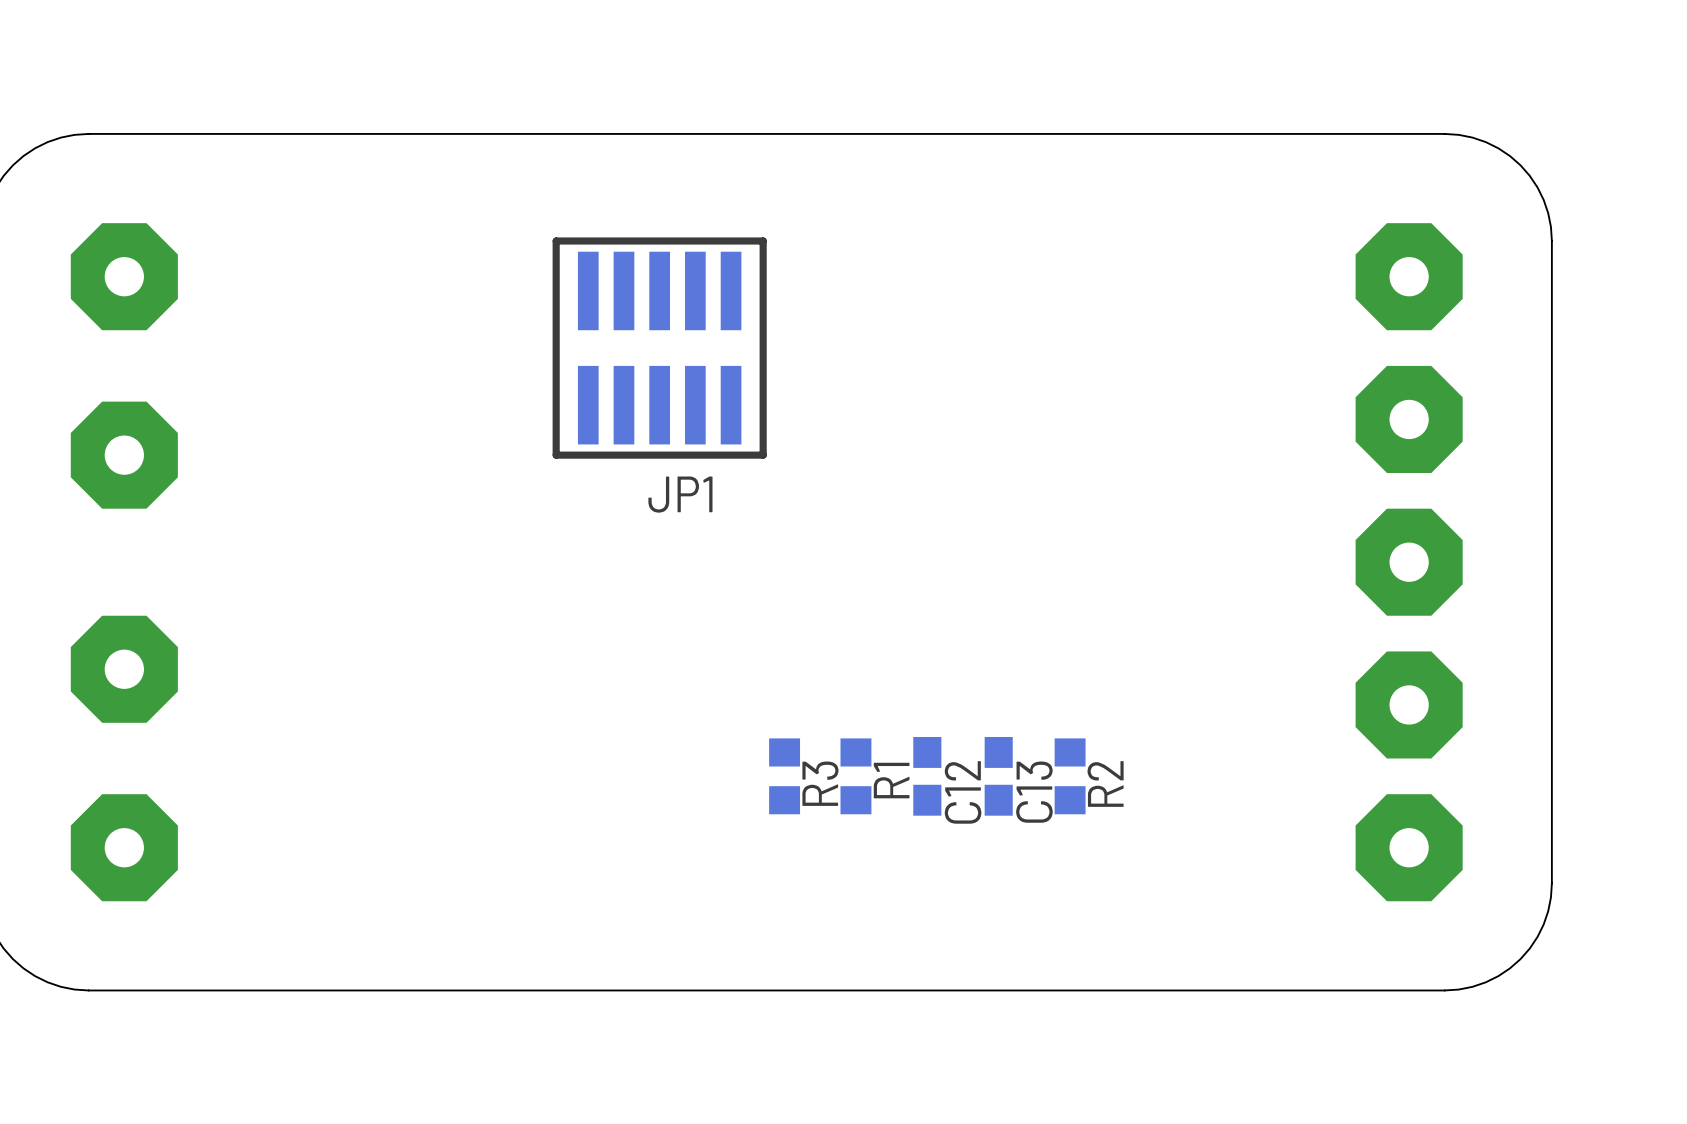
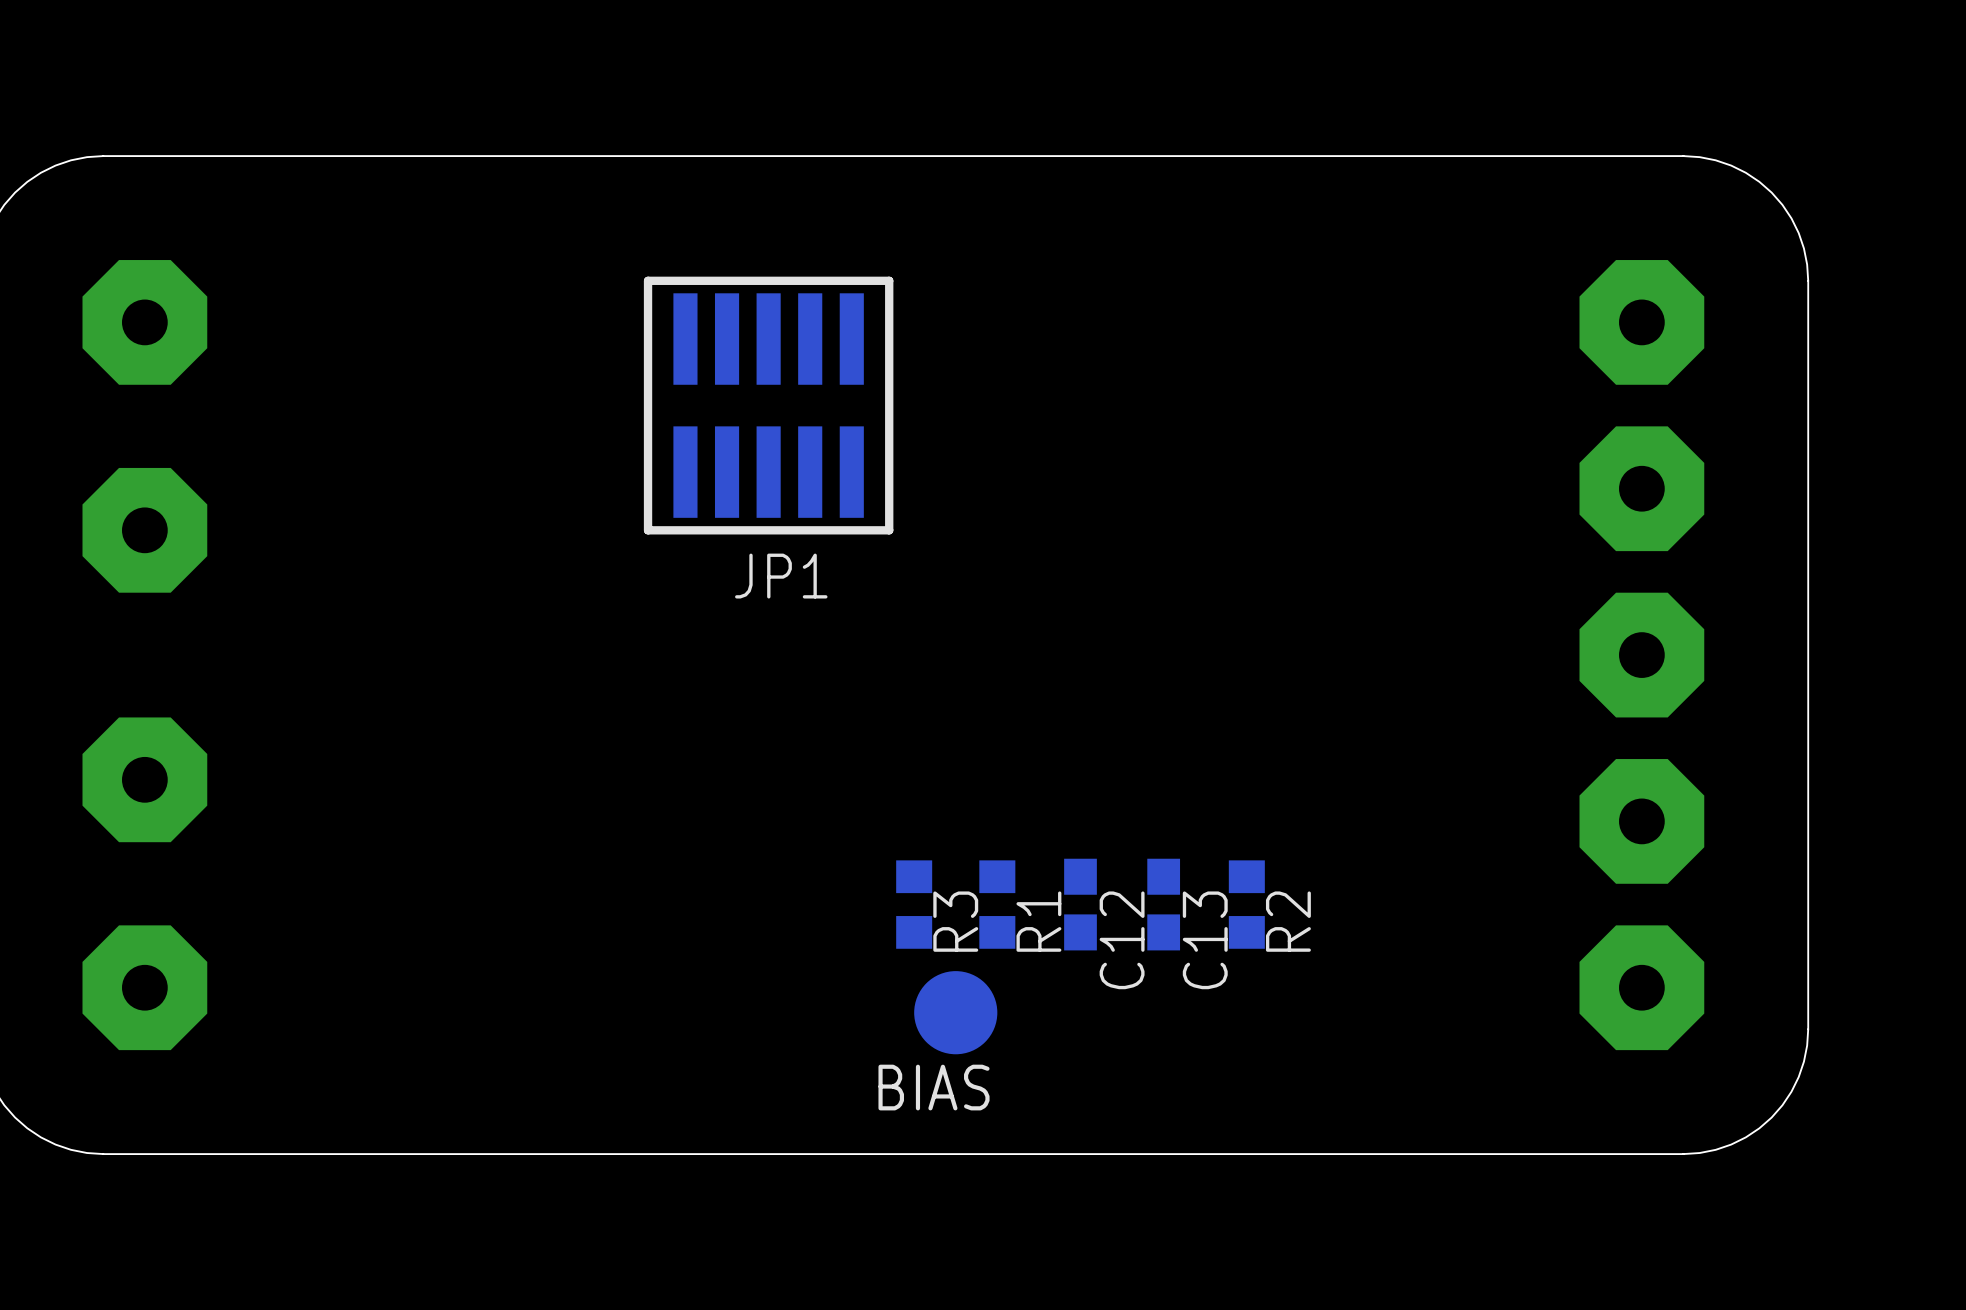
BIAS: none -> (955, 1012)

